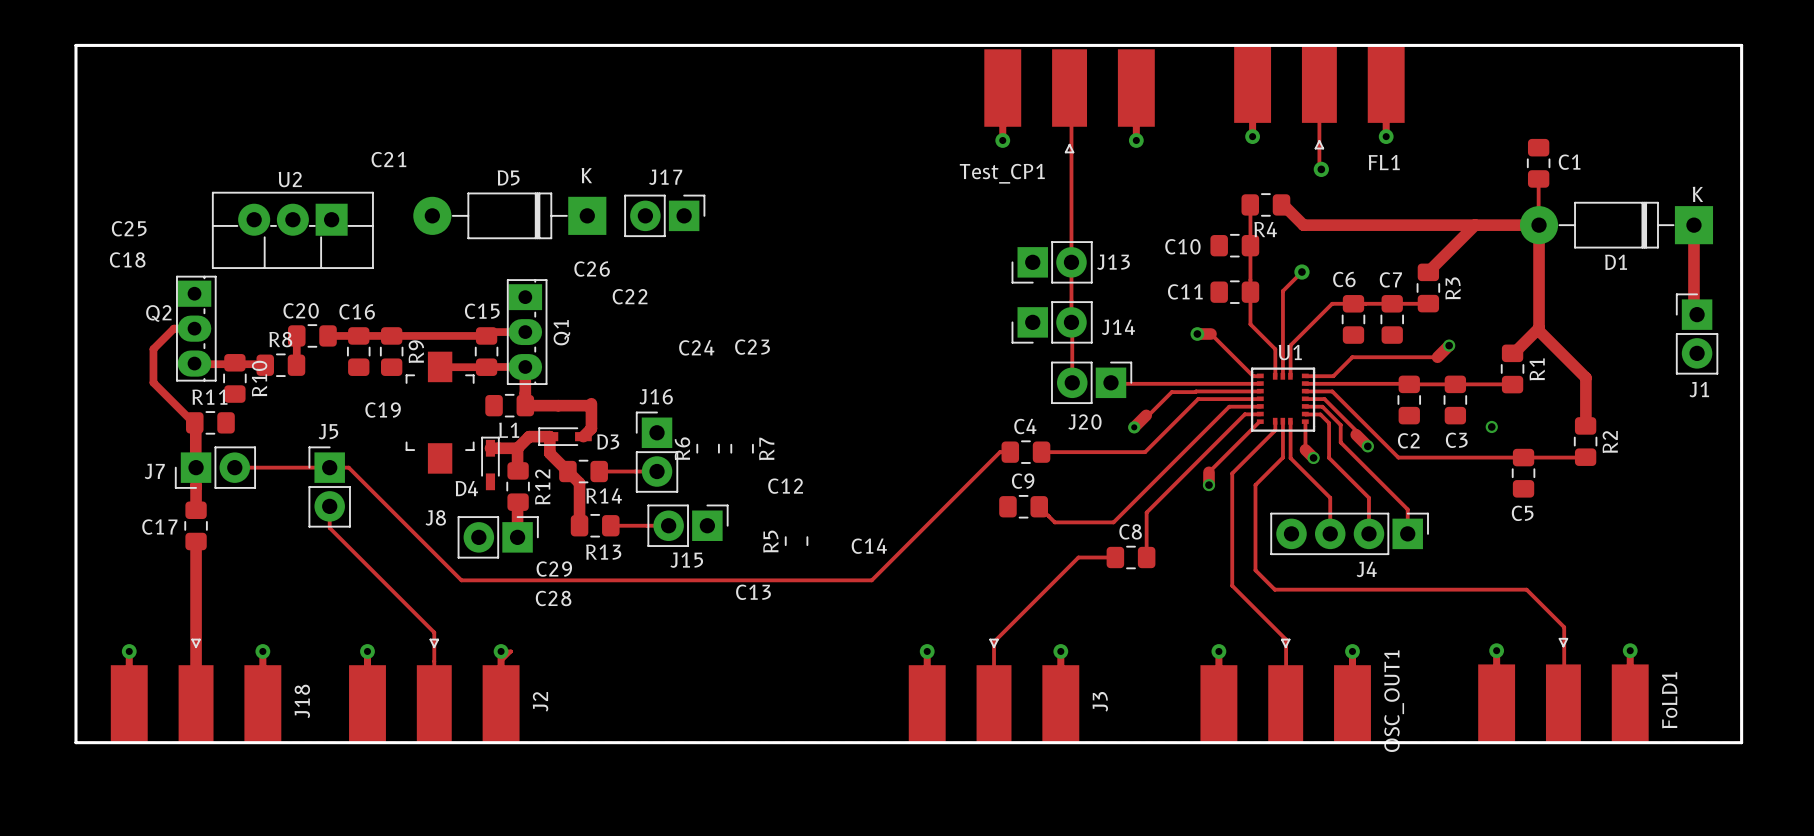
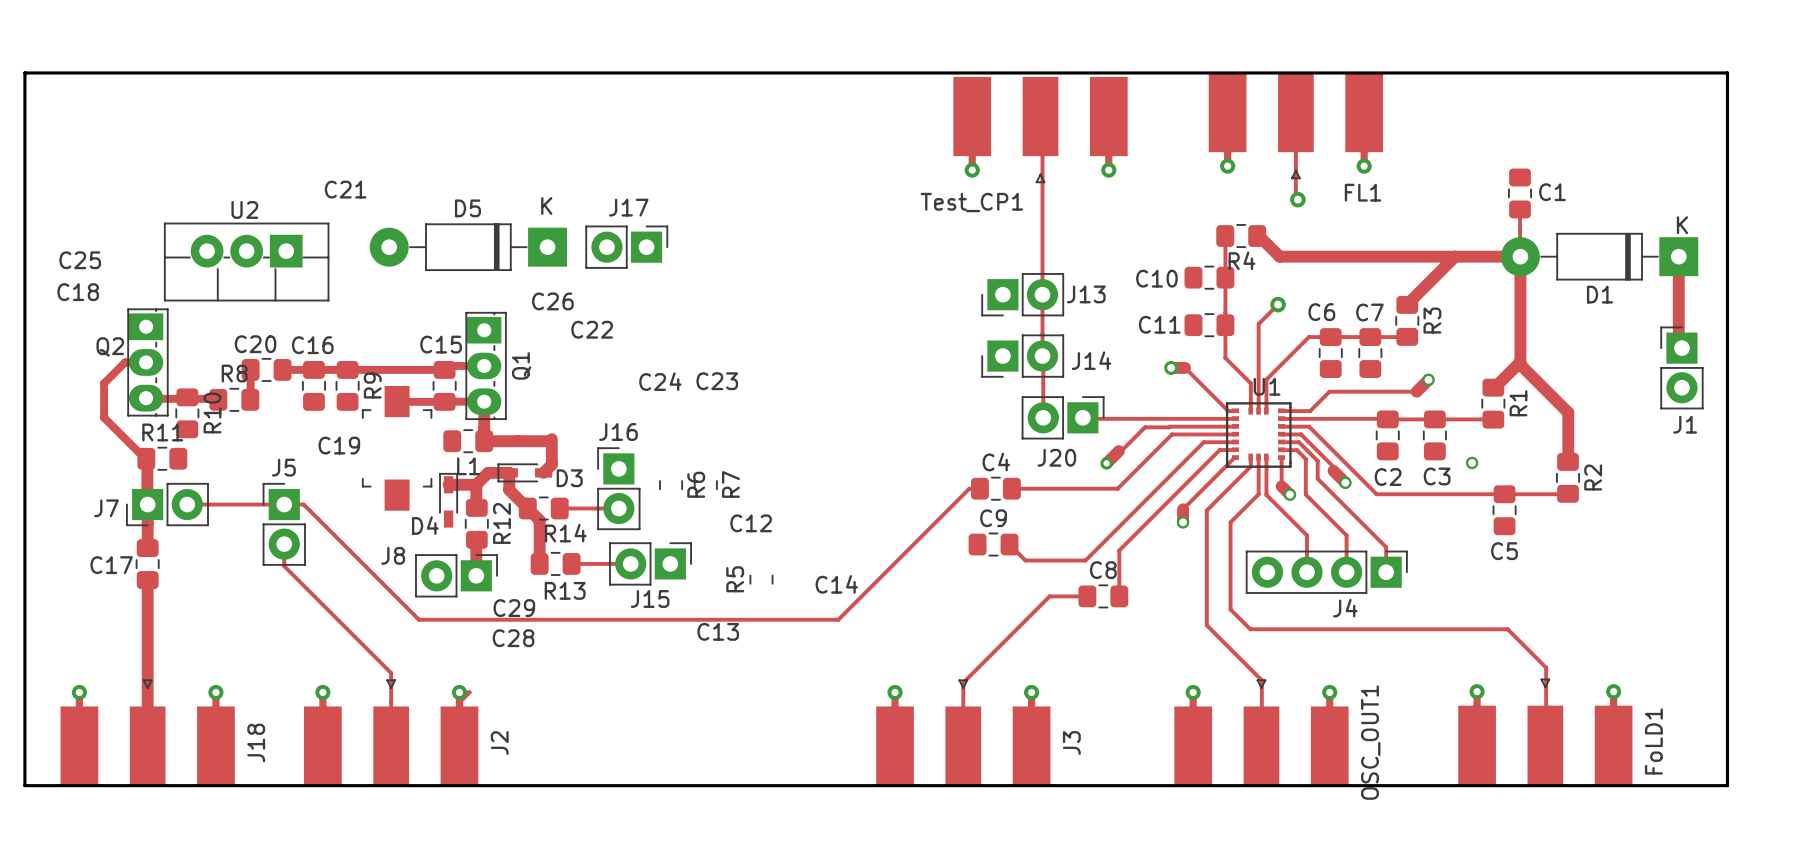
R6 name position: R6 (682, 448) -> R6 (696, 484)

